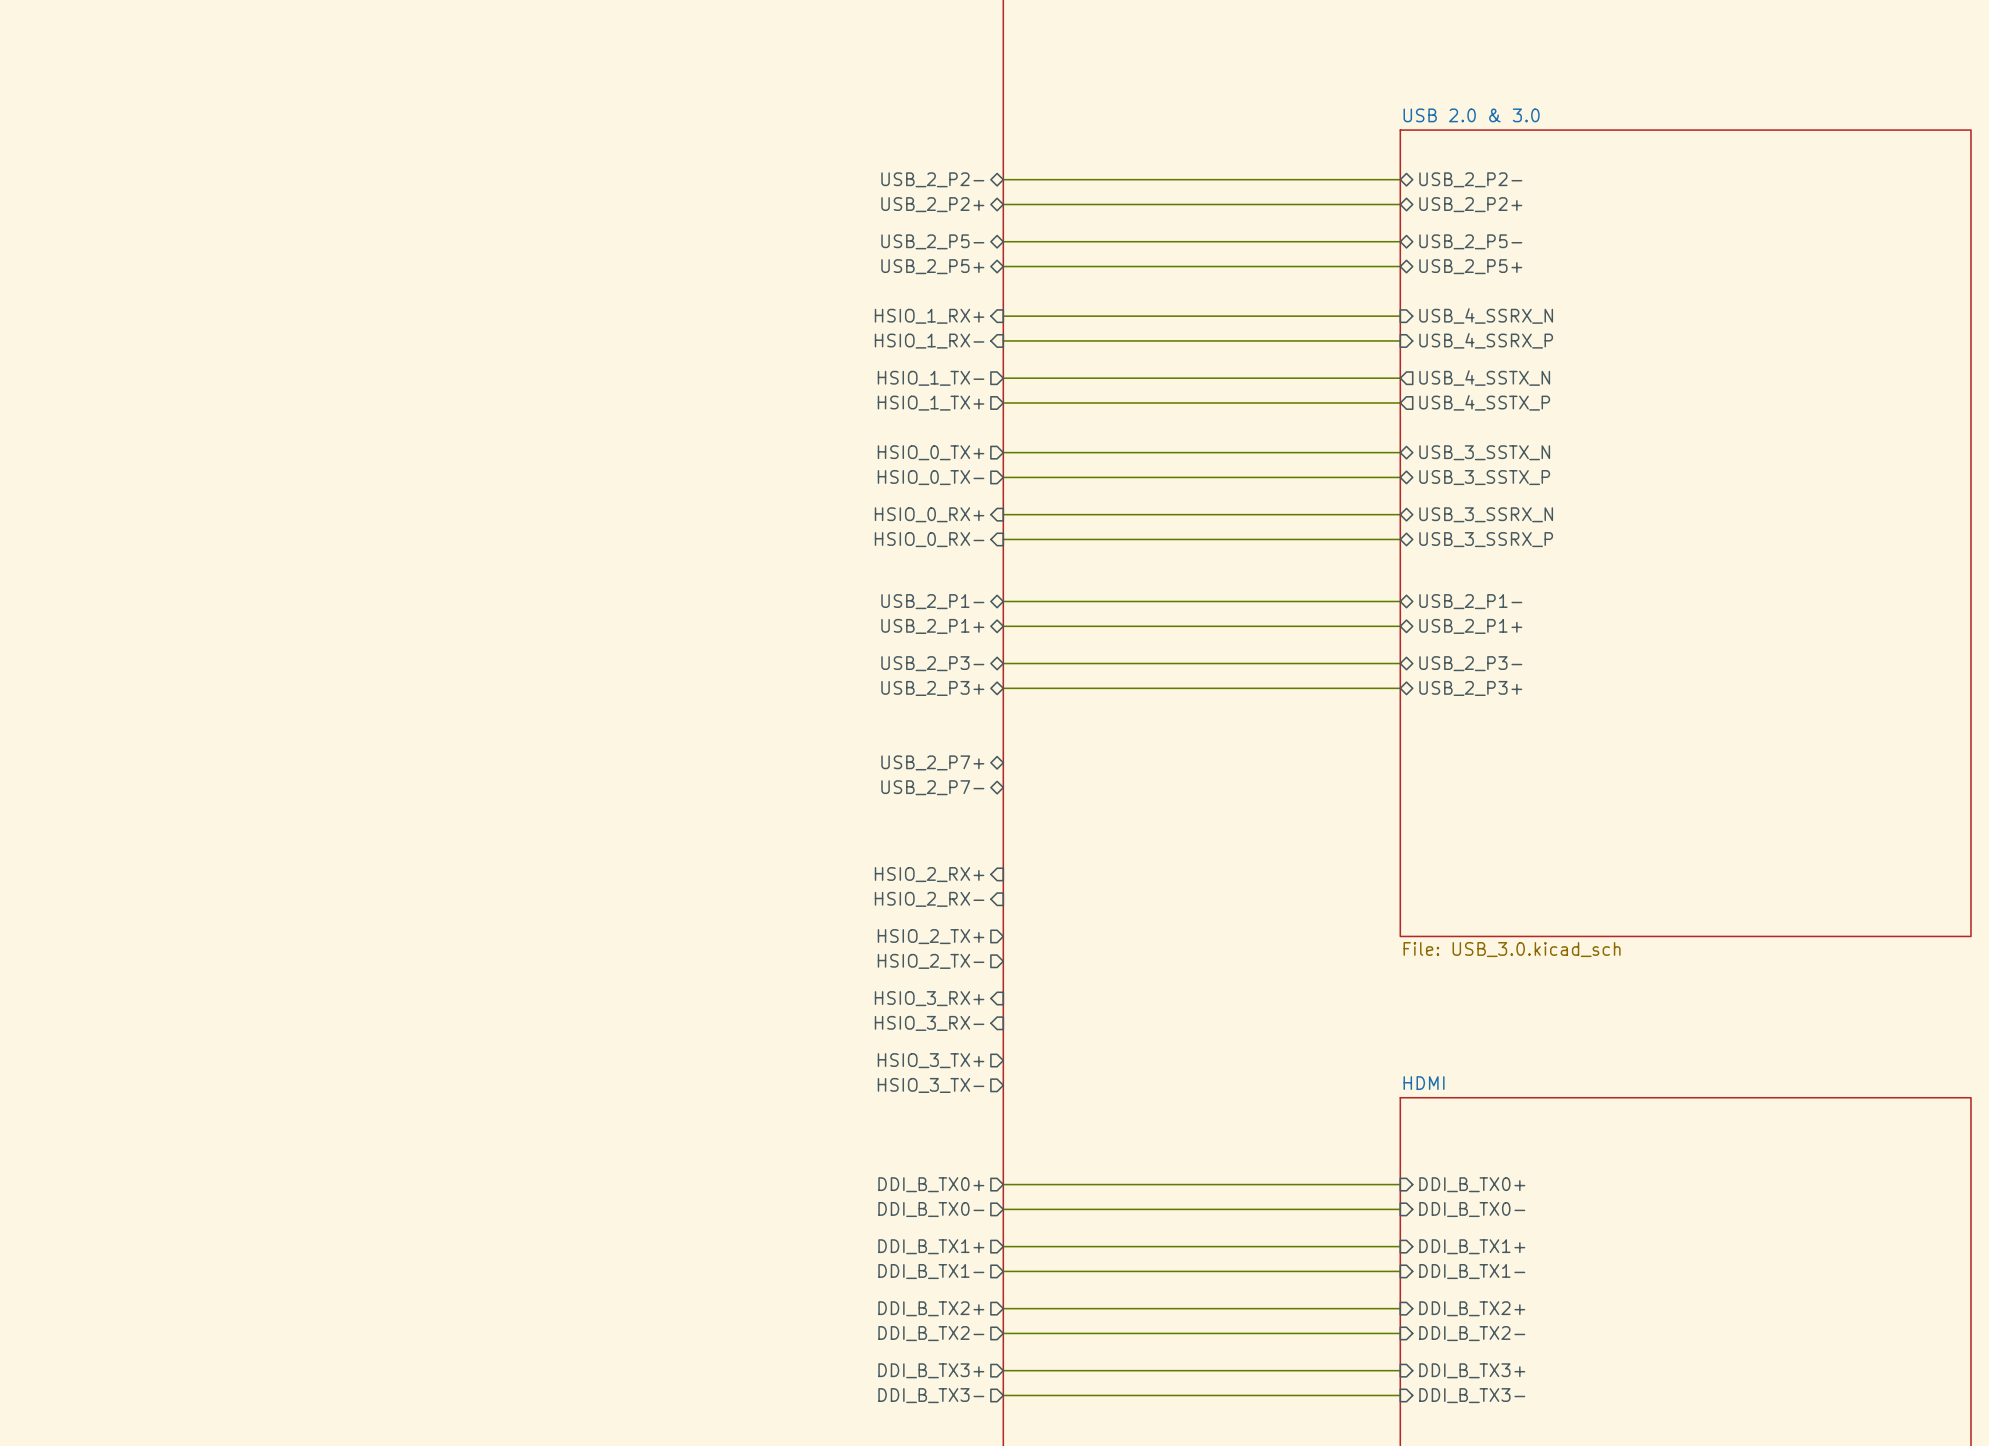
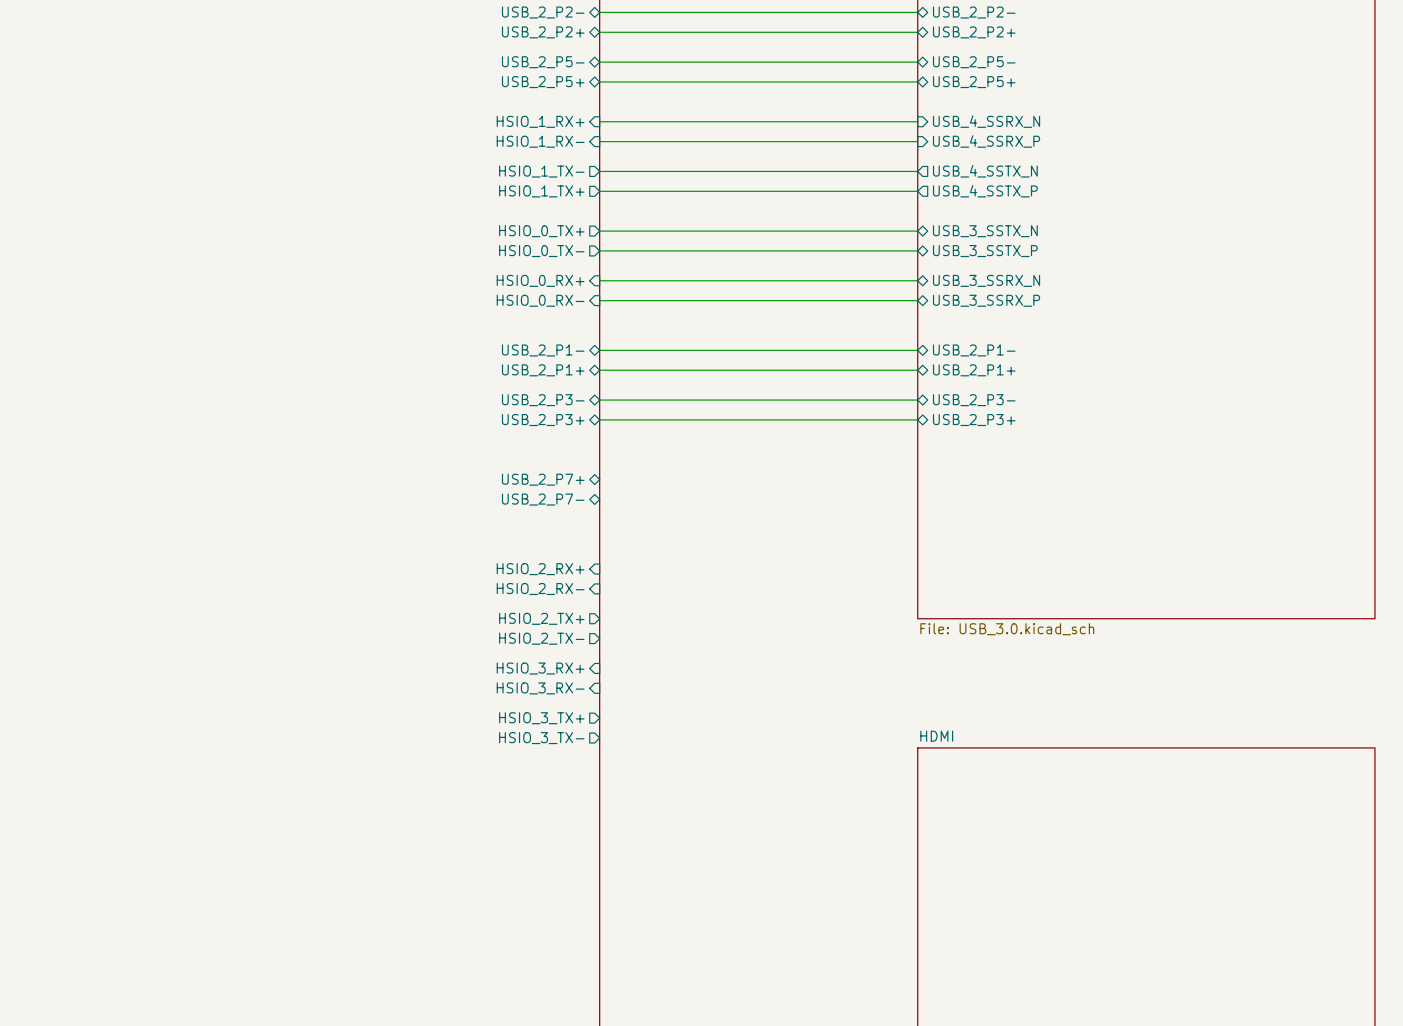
sheet pin: DDI_B_TX0+ (931, 1184) -> none
wire: (1003, 1184) (1400, 1184) -> none
sheet pin: DDI_B_TX0+ (1472, 1184) -> none
sheet pin: DDI_B_TX0- (931, 1209) -> none
wire: (1003, 1209) (1400, 1209) -> none
sheet pin: DDI_B_TX0- (1472, 1209) -> none
sheet pin: DDI_B_TX1+ (931, 1246) -> none
wire: (1003, 1246) (1400, 1246) -> none
sheet pin: DDI_B_TX1+ (1472, 1246) -> none
sheet pin: DDI_B_TX1- (931, 1271) -> none
wire: (1003, 1271) (1400, 1271) -> none
sheet pin: DDI_B_TX1- (1472, 1271) -> none
sheet pin: DDI_B_TX2+ (931, 1308) -> none
wire: (1003, 1308) (1400, 1308) -> none
sheet pin: DDI_B_TX2+ (1472, 1308) -> none
sheet pin: DDI_B_TX2- (931, 1333) -> none
wire: (1003, 1333) (1400, 1333) -> none
sheet pin: DDI_B_TX2- (1472, 1333) -> none
sheet pin: DDI_B_TX3+ (931, 1370) -> none
wire: (1003, 1370) (1400, 1370) -> none
sheet pin: DDI_B_TX3+ (1472, 1370) -> none
sheet pin: DDI_B_TX3- (931, 1395) -> none
wire: (1003, 1395) (1400, 1395) -> none
sheet pin: DDI_B_TX3- (1472, 1395) -> none

